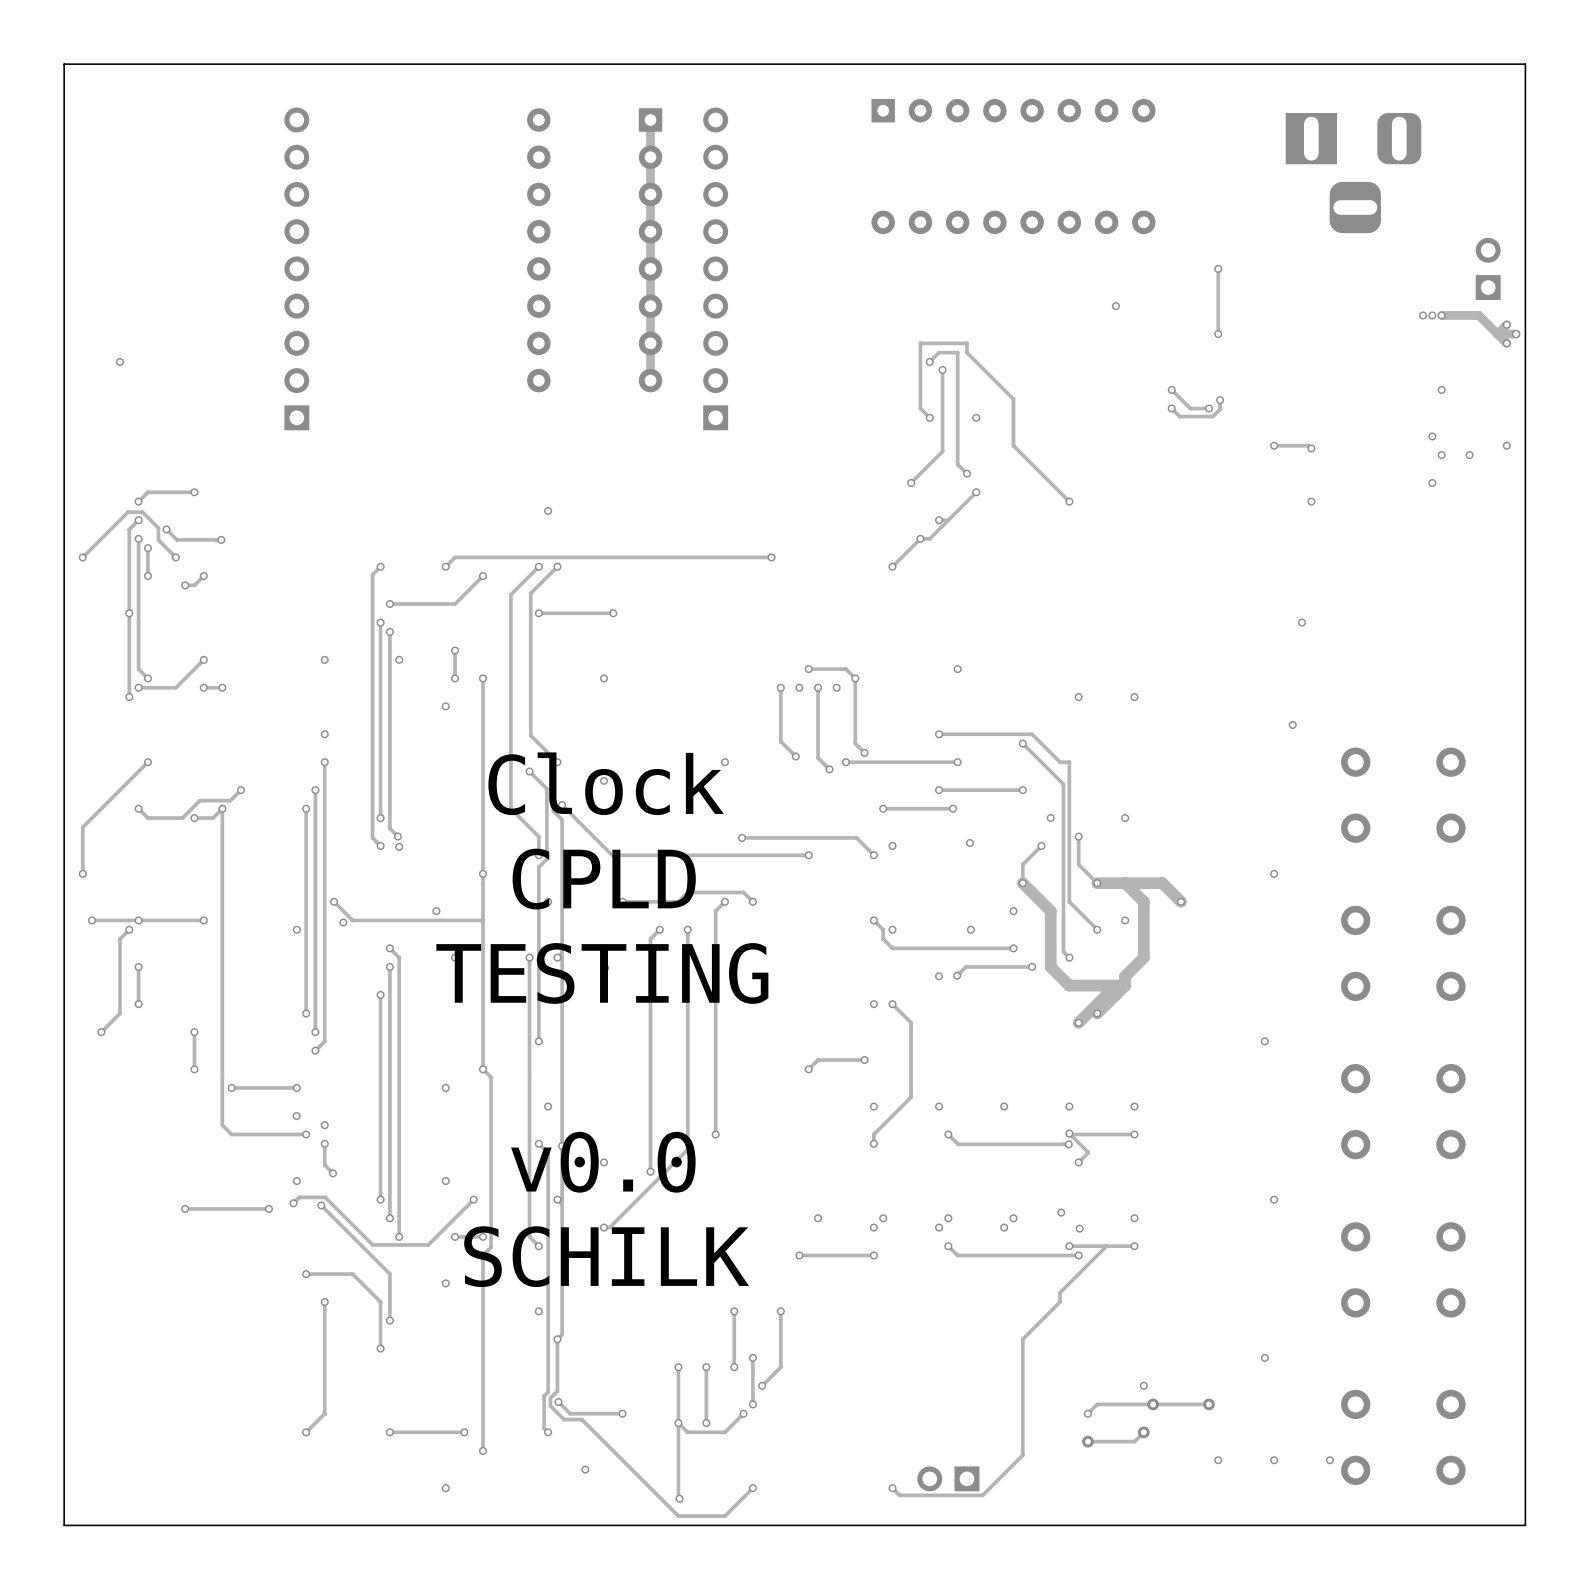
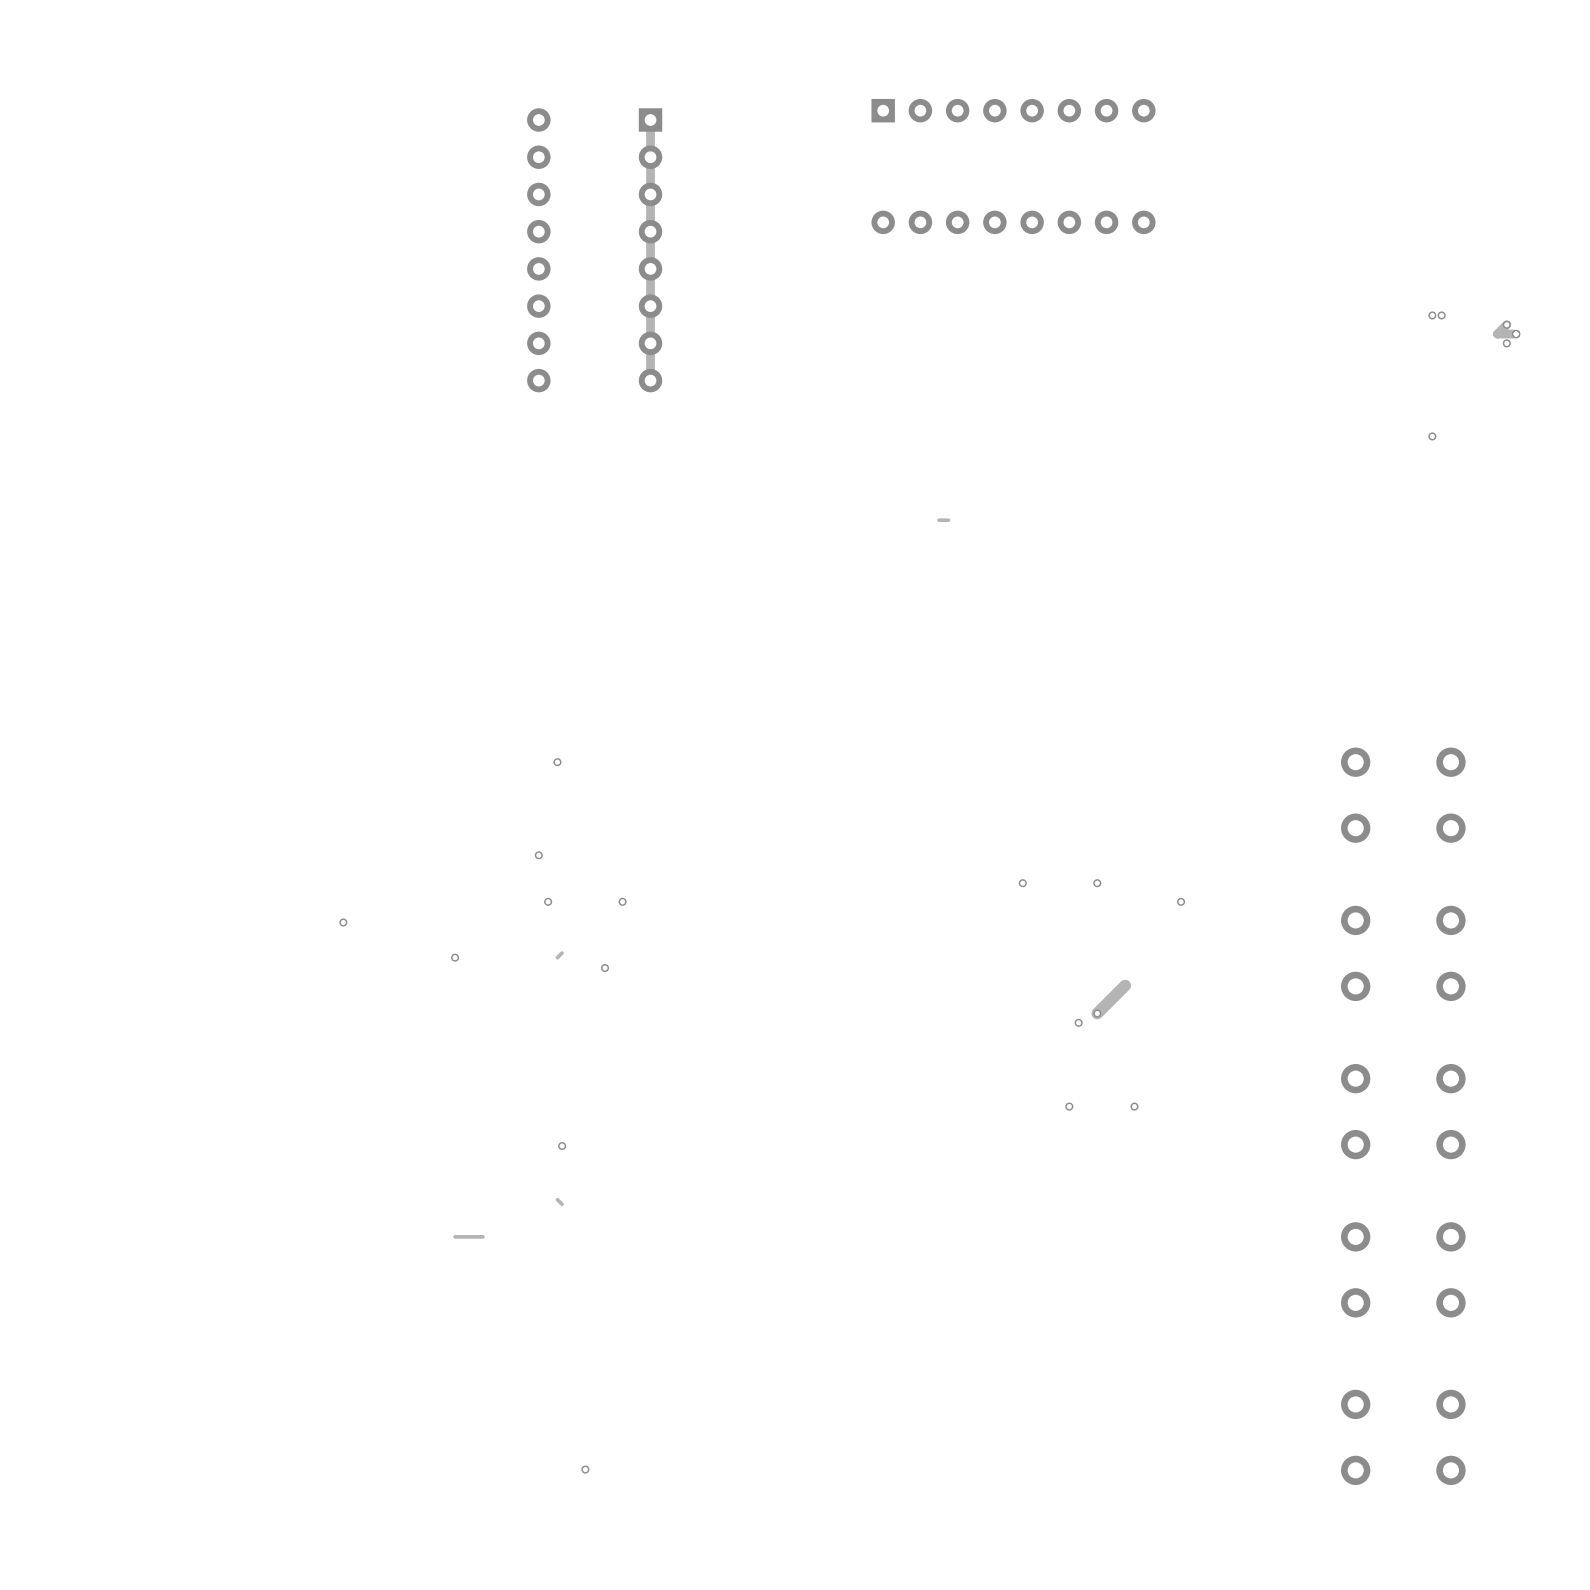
board edge: (1525, 64) (64, 64) (64, 1525) (1525, 1525) (1525, 64) -> none
part: (1353, 173) -> none
part: (296, 268) -> none
part: (715, 268) -> none
track: (1218, 268) (1218, 334) -> none
via: (1218, 268) -> none
part: (1488, 268) -> none
via: (1115, 306) -> none
via: (1423, 315) -> none
track: (1441, 315) (1478, 315) (1506, 343) -> none
via: (1218, 334) -> none
via: (119, 361) -> none
track: (929, 361) (939, 352) (957, 352) (957, 464) (966, 473) -> none
via: (929, 361) -> none
track: (942, 369) (942, 451) (911, 482) -> none
via: (942, 369) -> none
track: (1171, 389) (1190, 408) (1208, 408) -> none
via: (1171, 389) -> none
via: (1441, 389) -> none
track: (1220, 400) (1220, 409) (1212, 416) (1179, 416) (1171, 408) -> none
via: (1220, 400) -> none
via: (1171, 408) -> none
via: (1208, 408) -> none
track: (929, 417) (920, 408) (920, 343) (966, 343) (966, 352) (1013, 399) (1013, 445) (1069, 501) -> none
via: (929, 417) -> none
via: (976, 417) -> none
track: (1274, 445) (1308, 445) (1311, 448) -> none
via: (1274, 445) -> none
via: (1506, 445) -> none
via: (1311, 448) -> none
via: (1441, 455) -> none
via: (1469, 455) -> none
via: (966, 473) -> none
via: (911, 482) -> none
via: (1432, 482) -> none
track: (194, 492) (147, 492) (138, 501) -> none
via: (194, 492) -> none
track: (976, 492) (929, 538) (920, 538) (892, 566) -> none
via: (976, 492) -> none
via: (138, 501) -> none
via: (1069, 501) -> none
via: (1311, 501) -> none
via: (548, 510) -> none
track: (138, 520) (129, 529) (129, 697) -> none
via: (138, 520) -> none
via: (939, 520) -> none
track: (166, 529) (176, 539) (221, 539) -> none
via: (166, 529) -> none
track: (138, 538) (138, 669) (147, 678) -> none
via: (138, 538) -> none
via: (920, 538) -> none
via: (221, 539) -> none
track: (147, 548) (147, 576) -> none
via: (147, 548) -> none
via: (82, 557) -> none
track: (175, 557) (158, 540) (158, 528) (142, 512) (128, 512) (82, 557) -> none
via: (175, 557) -> none
track: (771, 557) (455, 557) (445, 566) -> none
via: (771, 557) -> none
track: (380, 566) (372, 574) (372, 837) (380, 845) -> none
via: (380, 566) -> none
via: (445, 566) -> none
track: (538, 566) (510, 594) (510, 808) (538, 836) (538, 855) -> none
via: (538, 566) -> none
track: (557, 566) (530, 593) (530, 735) (557, 762) (553, 766) (553, 811) (562, 819) (562, 1334) (557, 1339) (557, 1391) (550, 1398) (550, 1405) (564, 1419) (581, 1419) (678, 1516) (724, 1516) (752, 1488) -> none
via: (557, 566) -> none
via: (892, 566) -> none
via: (147, 576) -> none
track: (203, 576) (194, 585) (185, 585) -> none
via: (203, 576) -> none
track: (482, 576) (455, 603) (389, 603) -> none
via: (482, 576) -> none
via: (185, 585) -> none
via: (389, 603) -> none
via: (129, 613) -> none
via: (538, 613) -> none
track: (613, 613) (538, 613) -> none
via: (613, 613) -> none
track: (380, 622) (380, 818) -> none
via: (380, 622) -> none
via: (1302, 622) -> none
track: (389, 631) (389, 828) (397, 836) -> none
via: (389, 631) -> none
track: (455, 650) (455, 678) -> none
via: (455, 650) -> none
track: (203, 659) (175, 687) (138, 687) -> none
via: (203, 659) -> none
via: (324, 659) -> none
via: (399, 659) -> none
track: (808, 669) (845, 669) (855, 678) (855, 743) (864, 752) -> none
via: (808, 669) -> none
via: (957, 669) -> none
via: (147, 678) -> none
via: (455, 678) -> none
track: (482, 678) (482, 1069) (491, 1077) (491, 1247) (482, 1255) (482, 1450) -> none
via: (482, 678) -> none
via: (603, 678) -> none
via: (855, 678) -> none
via: (138, 687) -> none
via: (203, 687) -> none
track: (222, 687) (203, 687) -> none
via: (222, 687) -> none
track: (780, 687) (780, 741) (795, 756) -> none
via: (780, 687) -> none
via: (799, 687) -> none
track: (818, 687) (818, 757) (829, 769) -> none
via: (818, 687) -> none
via: (836, 687) -> none
via: (129, 697) -> none
via: (1078, 697) -> none
via: (1134, 697) -> none
via: (445, 706) -> none
via: (1292, 724) -> none
via: (324, 734) -> none
track: (939, 734) (1032, 734) (1060, 762) (1069, 762) (1069, 901) (1097, 929) -> none
via: (939, 734) -> none
track: (1022, 743) (1063, 784) (1063, 951) (1069, 957) -> none
via: (1022, 743) -> none
via: (864, 752) -> none
via: (795, 756) -> none
track: (147, 762) (82, 827) (82, 873) -> none
via: (147, 762) -> none
track: (324, 762) (324, 1041) (315, 1050) -> none
via: (324, 762) -> none
via: (724, 762) -> none
via: (845, 762) -> none
track: (957, 762) (845, 762) -> none
via: (957, 762) -> none
via: (829, 769) -> none
track: (529, 771) (546, 788) (546, 859) (538, 867) (538, 1041) -> none
via: (529, 771) -> none
via: (603, 780) -> none
text: Clock (606, 783) -> none
track: (240, 790) (230, 800) (199, 800) (182, 818) (147, 818) (138, 808) -> none
via: (240, 790) -> none
track: (315, 790) (315, 1032) -> none
via: (315, 790) -> none
via: (939, 790) -> none
track: (1022, 790) (939, 790) -> none
via: (1022, 790) -> none
track: (562, 805) (612, 855) (808, 855) -> none
via: (562, 805) -> none
via: (138, 808) -> none
via: (222, 808) -> none
track: (306, 808) (306, 1013) -> none
via: (306, 808) -> none
via: (883, 808) -> none
track: (952, 808) (883, 808) -> none
via: (952, 808) -> none
track: (194, 818) (213, 818) (222, 808) (222, 1125) (231, 1134) (306, 1134) -> none
via: (194, 818) -> none
via: (380, 818) -> none
via: (1050, 818) -> none
via: (1125, 818) -> none
via: (397, 836) -> none
track: (1078, 836) (1078, 864) (1097, 883) (1162, 883) (1181, 901) -> none
via: (1078, 836) -> none
track: (742, 837) (856, 837) (873, 855) -> none
via: (742, 837) -> none
via: (969, 842) -> none
via: (380, 845) -> none
via: (892, 845) -> none
track: (1041, 845) (1022, 864) (1022, 883) (1050, 911) (1050, 966) (1069, 985) (1125, 985) (1125, 976) (1143, 957) (1143, 901) (1125, 883) -> none
via: (1041, 845) -> none
via: (399, 846) -> none
via: (808, 855) -> none
via: (873, 855) -> none
via: (82, 873) -> none
via: (482, 873) -> none
via: (1274, 873) -> none
text: CPLD (604, 879) -> none
track: (334, 901) (352, 920) (482, 920) -> none
via: (334, 901) -> none
track: (724, 901) (715, 911) (715, 1134) -> none
via: (724, 901) -> none
track: (752, 901) (743, 892) (687, 892) (678, 901) (622, 901) -> none
via: (752, 901) -> none
via: (436, 911) -> none
via: (1013, 911) -> none
via: (92, 920) -> none
via: (138, 920) -> none
track: (203, 920) (92, 920) -> none
via: (203, 920) -> none
track: (873, 920) (883, 929) (883, 939) (892, 948) (1013, 948) -> none
via: (873, 920) -> none
via: (1125, 920) -> none
track: (129, 929) (119, 939) (119, 1013) (101, 1032) -> none
via: (129, 929) -> none
via: (296, 929) -> none
track: (659, 929) (650, 939) (650, 1171) -> none
via: (659, 929) -> none
track: (687, 929) (687, 1149) (609, 1227) (603, 1227) -> none
via: (687, 929) -> none
via: (892, 929) -> none
via: (970, 929) -> none
via: (1097, 929) -> none
track: (389, 948) (399, 957) (399, 1236) -> none
via: (389, 948) -> none
via: (1013, 948) -> none
track: (529, 957) (529, 1236) (538, 1246) -> none
via: (529, 957) -> none
via: (557, 957) -> none
via: (1069, 957) -> none
track: (138, 966) (138, 1004) -> none
via: (138, 966) -> none
track: (389, 966) (389, 1218) -> none
via: (389, 966) -> none
track: (1032, 966) (965, 966) (957, 975) -> none
via: (1032, 966) -> none
text: TESTING (602, 973) -> none
via: (957, 975) -> none
via: (939, 976) -> none
track: (380, 994) (380, 1199) -> none
via: (380, 994) -> none
track: (1115, 994) (1106, 994) (1078, 1022) -> none
via: (138, 1004) -> none
via: (873, 1004) -> none
track: (892, 1004) (911, 1022) (911, 1097) (873, 1134) (873, 1143) -> none
via: (892, 1004) -> none
via: (306, 1013) -> none
via: (101, 1032) -> none
track: (194, 1032) (194, 1069) -> none
via: (194, 1032) -> none
via: (315, 1032) -> none
via: (538, 1041) -> none
via: (1264, 1041) -> none
via: (315, 1050) -> none
track: (864, 1060) (818, 1060) (808, 1069) -> none
via: (864, 1060) -> none
via: (194, 1069) -> none
via: (482, 1069) -> none
via: (808, 1069) -> none
via: (231, 1087) -> none
track: (296, 1087) (231, 1087) -> none
via: (296, 1087) -> none
via: (445, 1087) -> none
via: (548, 1106) -> none
via: (873, 1106) -> none
via: (939, 1106) -> none
via: (1004, 1106) -> none
via: (296, 1116) -> none
via: (324, 1125) -> none
track: (1069, 1133) (1087, 1152) (1078, 1162) -> none
via: (1069, 1133) -> none
via: (306, 1134) -> none
via: (715, 1134) -> none
track: (948, 1134) (958, 1144) (1068, 1144) -> none
via: (948, 1134) -> none
track: (1134, 1134) (1070, 1134) -> none
via: (1134, 1134) -> none
track: (324, 1143) (324, 1165) (333, 1173) -> none
via: (324, 1143) -> none
track: (538, 1143) (548, 1153) (548, 1392) (544, 1396) (544, 1428) (548, 1432) -> none
via: (538, 1143) -> none
via: (873, 1143) -> none
via: (1068, 1144) -> none
text: v0.0 (603, 1162) -> none
via: (603, 1162) -> none
via: (1078, 1162) -> none
via: (650, 1171) -> none
via: (333, 1173) -> none
via: (296, 1181) -> none
via: (445, 1181) -> none
via: (380, 1199) -> none
track: (473, 1199) (428, 1244) (372, 1244) (325, 1197) (299, 1197) (293, 1203) -> none
via: (473, 1199) -> none
via: (557, 1199) -> none
via: (1274, 1199) -> none
via: (293, 1203) -> none
track: (321, 1205) (389, 1274) (389, 1320) -> none
via: (321, 1205) -> none
via: (185, 1208) -> none
track: (268, 1208) (185, 1208) -> none
via: (268, 1208) -> none
via: (1061, 1212) -> none
via: (389, 1218) -> none
via: (818, 1218) -> none
via: (883, 1218) -> none
via: (948, 1218) -> none
via: (1013, 1218) -> none
via: (1134, 1218) -> none
via: (603, 1227) -> none
via: (873, 1227) -> none
via: (939, 1227) -> none
via: (1004, 1227) -> none
via: (1079, 1228) -> none
via: (399, 1236) -> none
via: (455, 1236) -> none
via: (482, 1236) -> none
via: (538, 1246) -> none
track: (948, 1246) (957, 1255) (1078, 1255) -> none
via: (948, 1246) -> none
via: (1069, 1246) -> none
track: (1106, 1246) (1060, 1292) (1060, 1302) (1022, 1339) (1022, 1455) (982, 1495) (899, 1495) (892, 1488) -> none
track: (1134, 1246) (1069, 1246) -> none
via: (1134, 1246) -> none
via: (799, 1255) -> none
track: (873, 1255) (799, 1255) -> none
via: (873, 1255) -> none
via: (1078, 1255) -> none
text: SCHILK (606, 1256) -> none
track: (306, 1274) (352, 1274) (380, 1302) (380, 1348) -> none
via: (306, 1274) -> none
via: (445, 1283) -> none
track: (324, 1302) (324, 1413) (306, 1432) -> none
via: (324, 1302) -> none
via: (538, 1311) -> none
track: (734, 1311) (734, 1367) -> none
via: (734, 1311) -> none
track: (780, 1311) (780, 1367) (762, 1385) -> none
via: (780, 1311) -> none
via: (389, 1320) -> none
via: (557, 1339) -> none
via: (380, 1348) -> none
track: (752, 1357) (752, 1404) -> none
via: (752, 1357) -> none
via: (1264, 1357) -> none
track: (678, 1367) (679, 1498) -> none
via: (678, 1367) -> none
track: (706, 1367) (706, 1423) -> none
via: (706, 1367) -> none
via: (734, 1367) -> none
via: (762, 1385) -> none
via: (1143, 1385) -> none
track: (558, 1402) (570, 1413) (622, 1413) -> none
via: (558, 1402) -> none
via: (752, 1404) -> none
via: (1153, 1404) -> none
track: (1208, 1404) (1097, 1404) (1087, 1413) -> none
via: (1208, 1404) -> none
via: (622, 1413) -> none
track: (743, 1413) (724, 1432) (687, 1432) (678, 1423) -> none
via: (743, 1413) -> none
via: (1087, 1413) -> none
via: (678, 1423) -> none
via: (706, 1423) -> none
via: (306, 1432) -> none
via: (389, 1432) -> none
track: (464, 1432) (389, 1432) -> none
via: (464, 1432) -> none
via: (548, 1432) -> none
track: (1143, 1432) (1134, 1441) (1087, 1441) -> none
via: (1143, 1432) -> none
via: (1087, 1441) -> none
via: (482, 1450) -> none
via: (1218, 1460) -> none
via: (1274, 1460) -> none
via: (1329, 1460) -> none
part: (948, 1478) -> none
via: (445, 1488) -> none
via: (752, 1488) -> none
via: (892, 1488) -> none
via: (679, 1498) -> none

